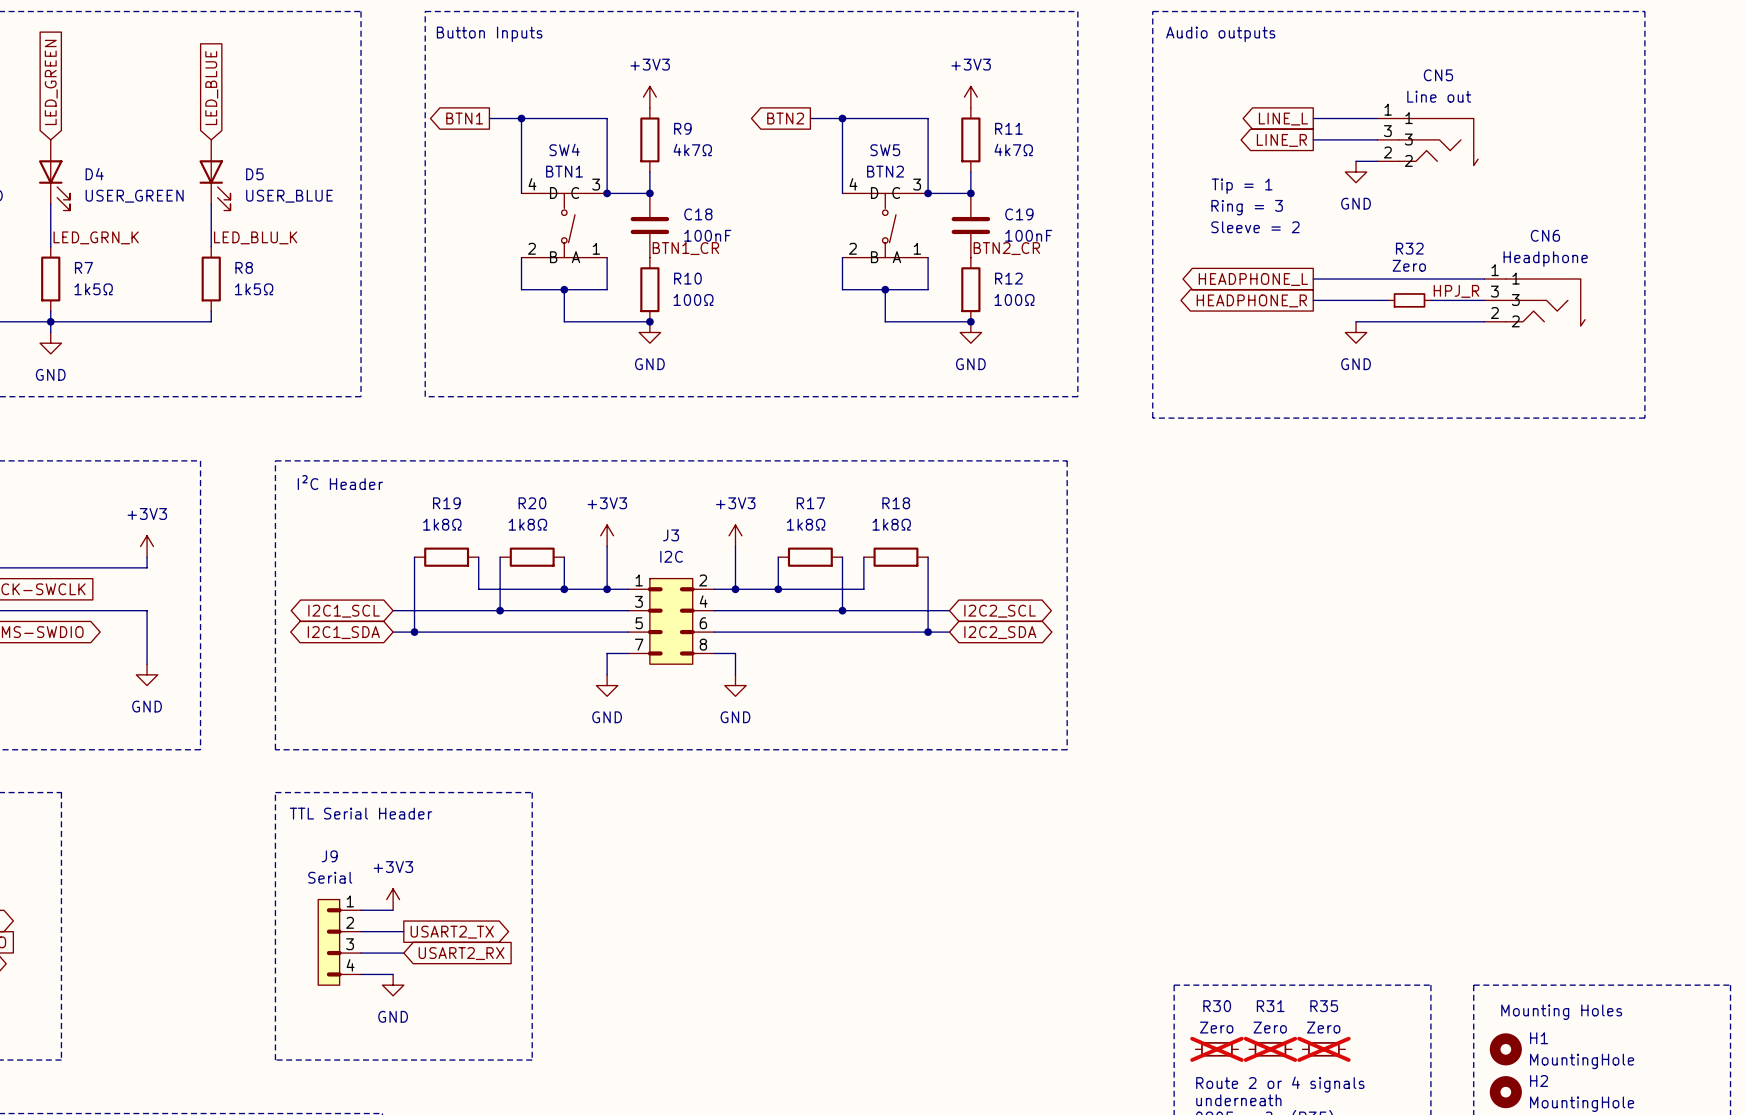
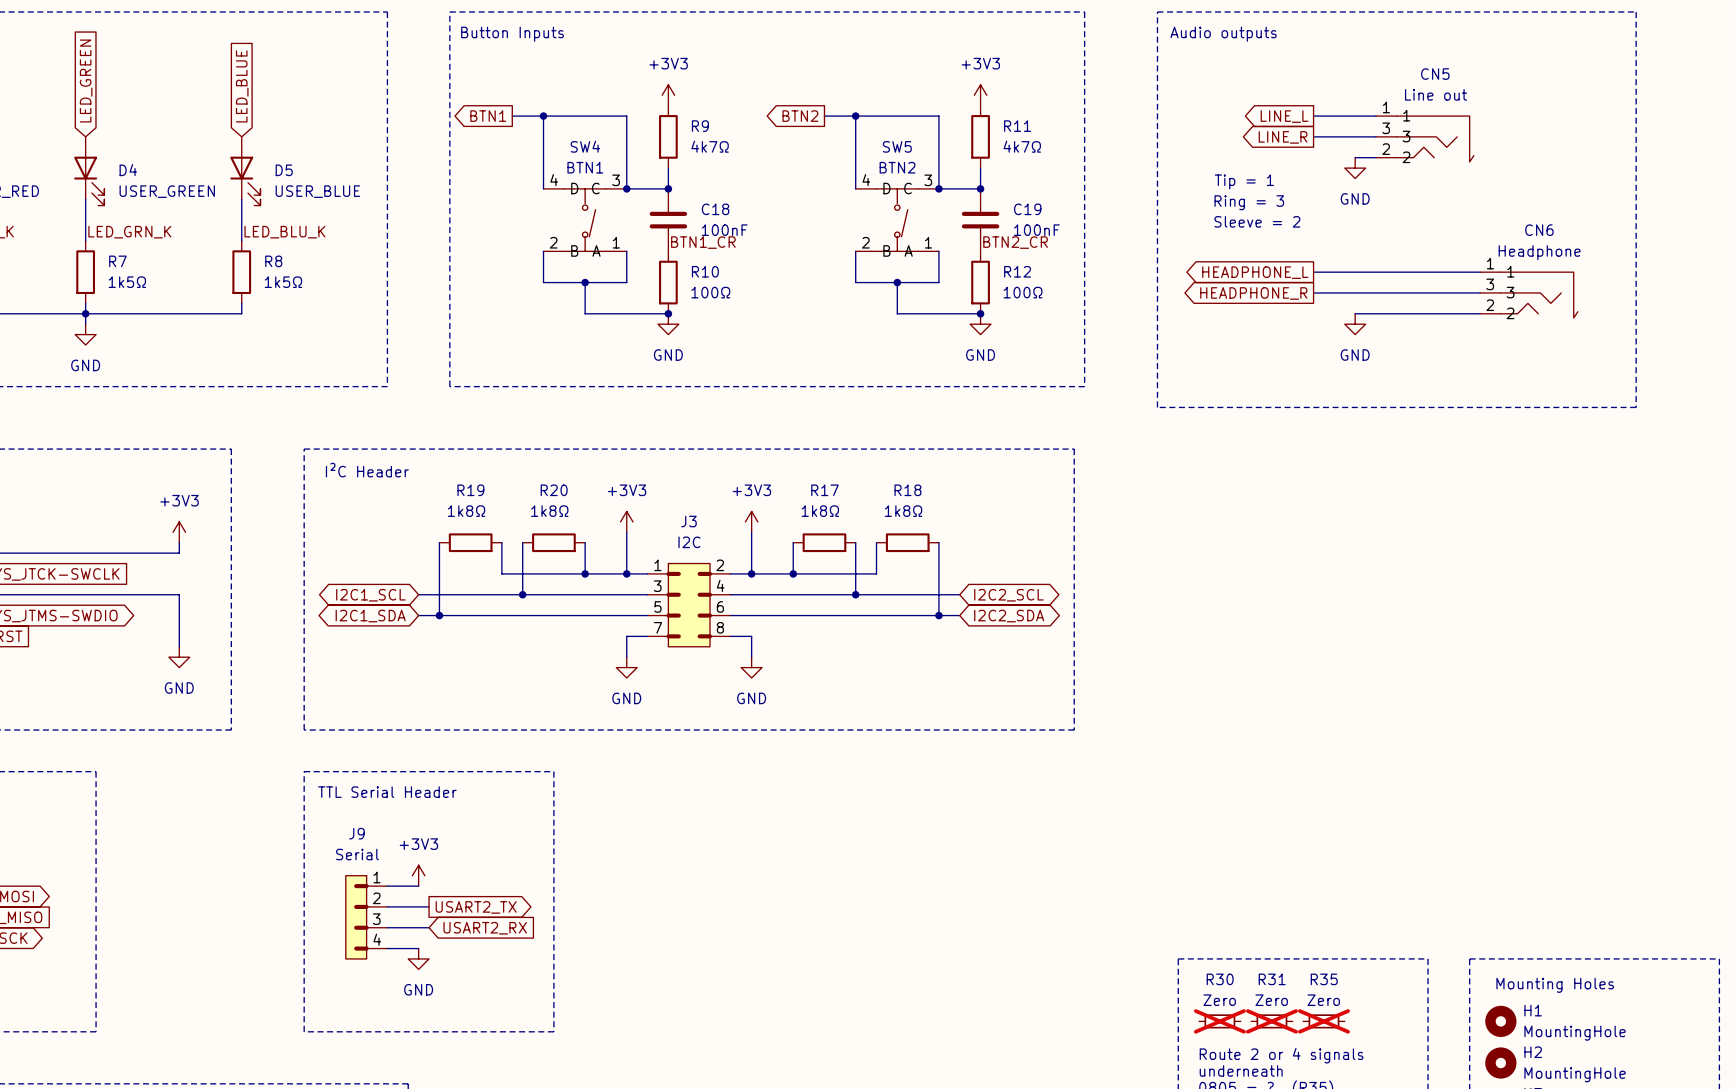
label: HPJ_R (1456, 291) -> none
wire: none -> (1386, 292) (1428, 292)
R32: Zero (1409, 300) -> none

